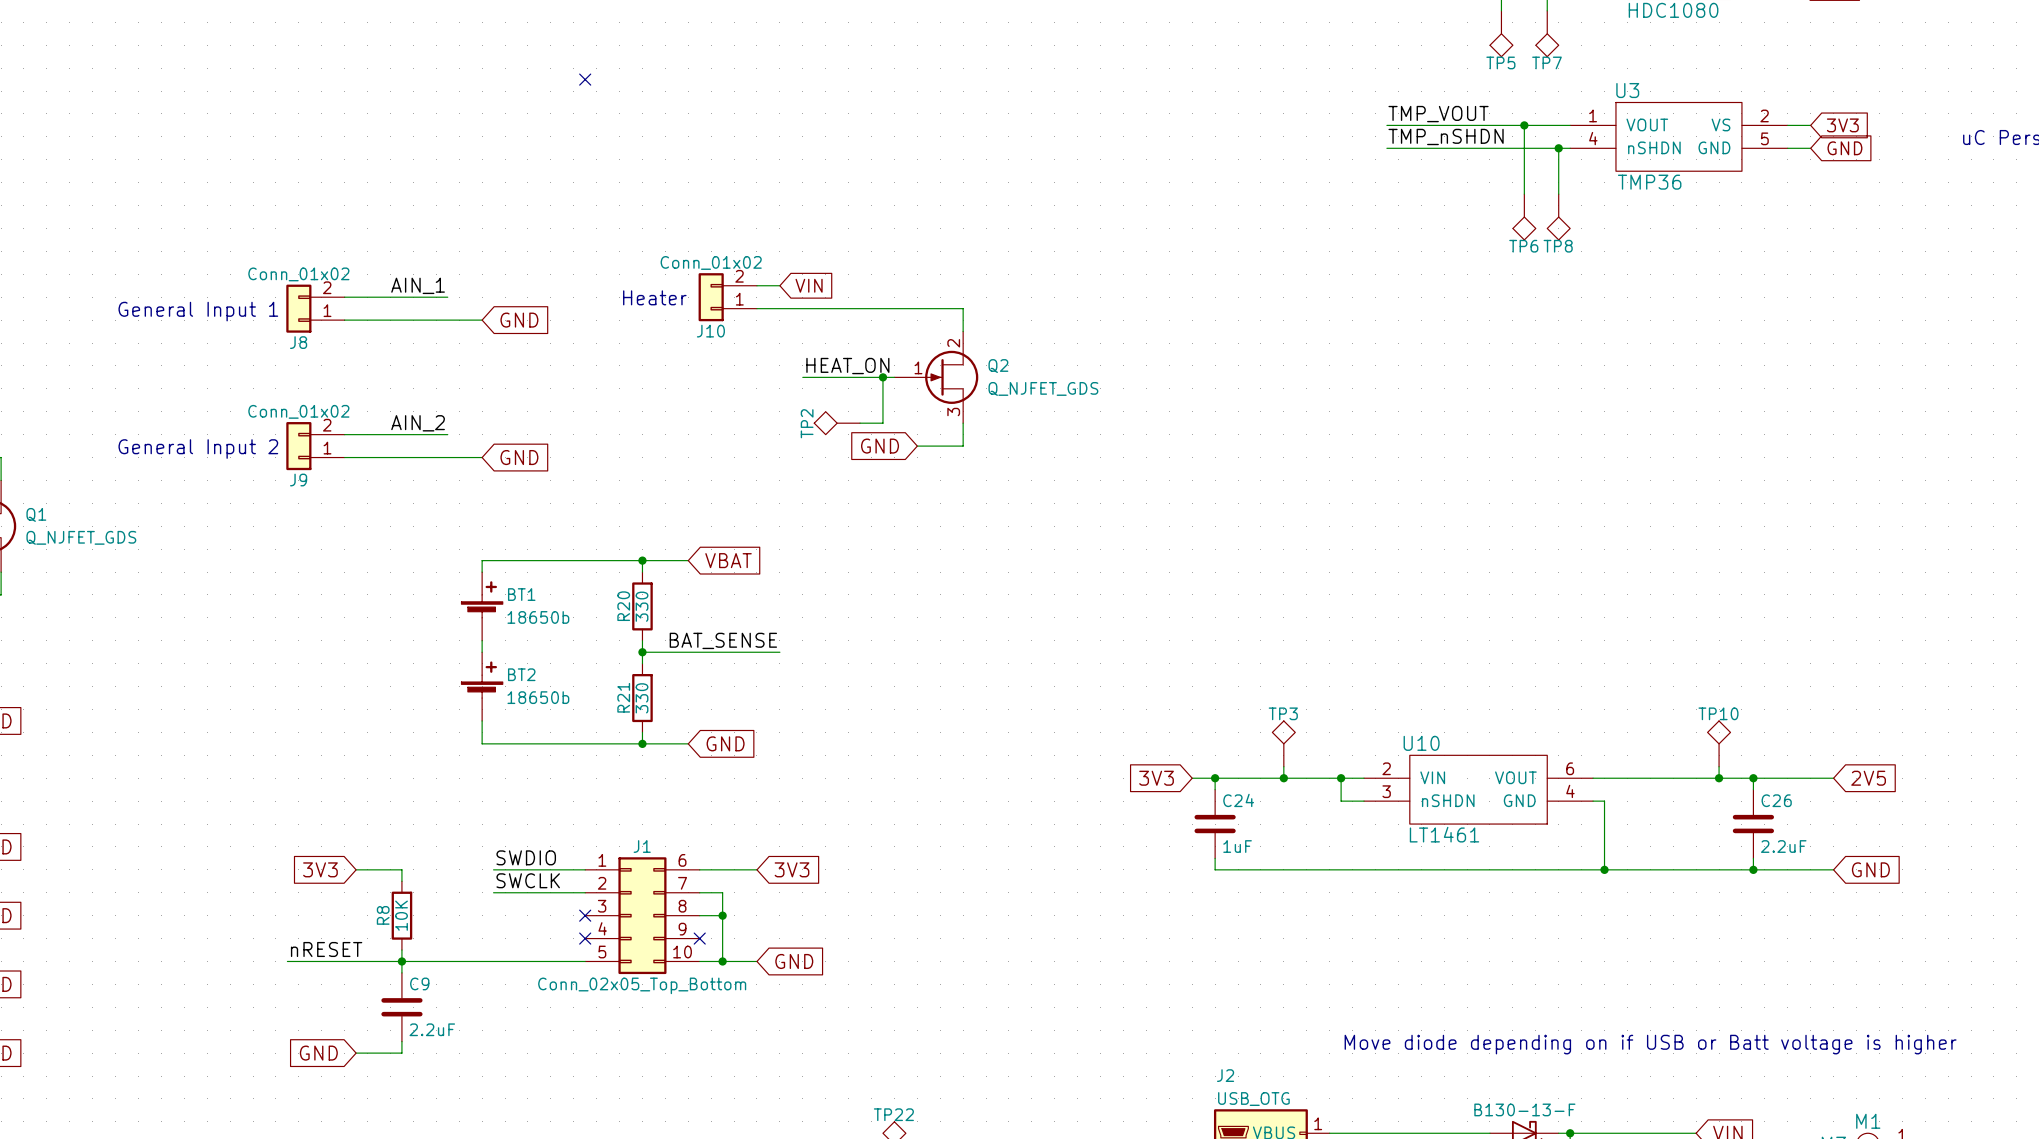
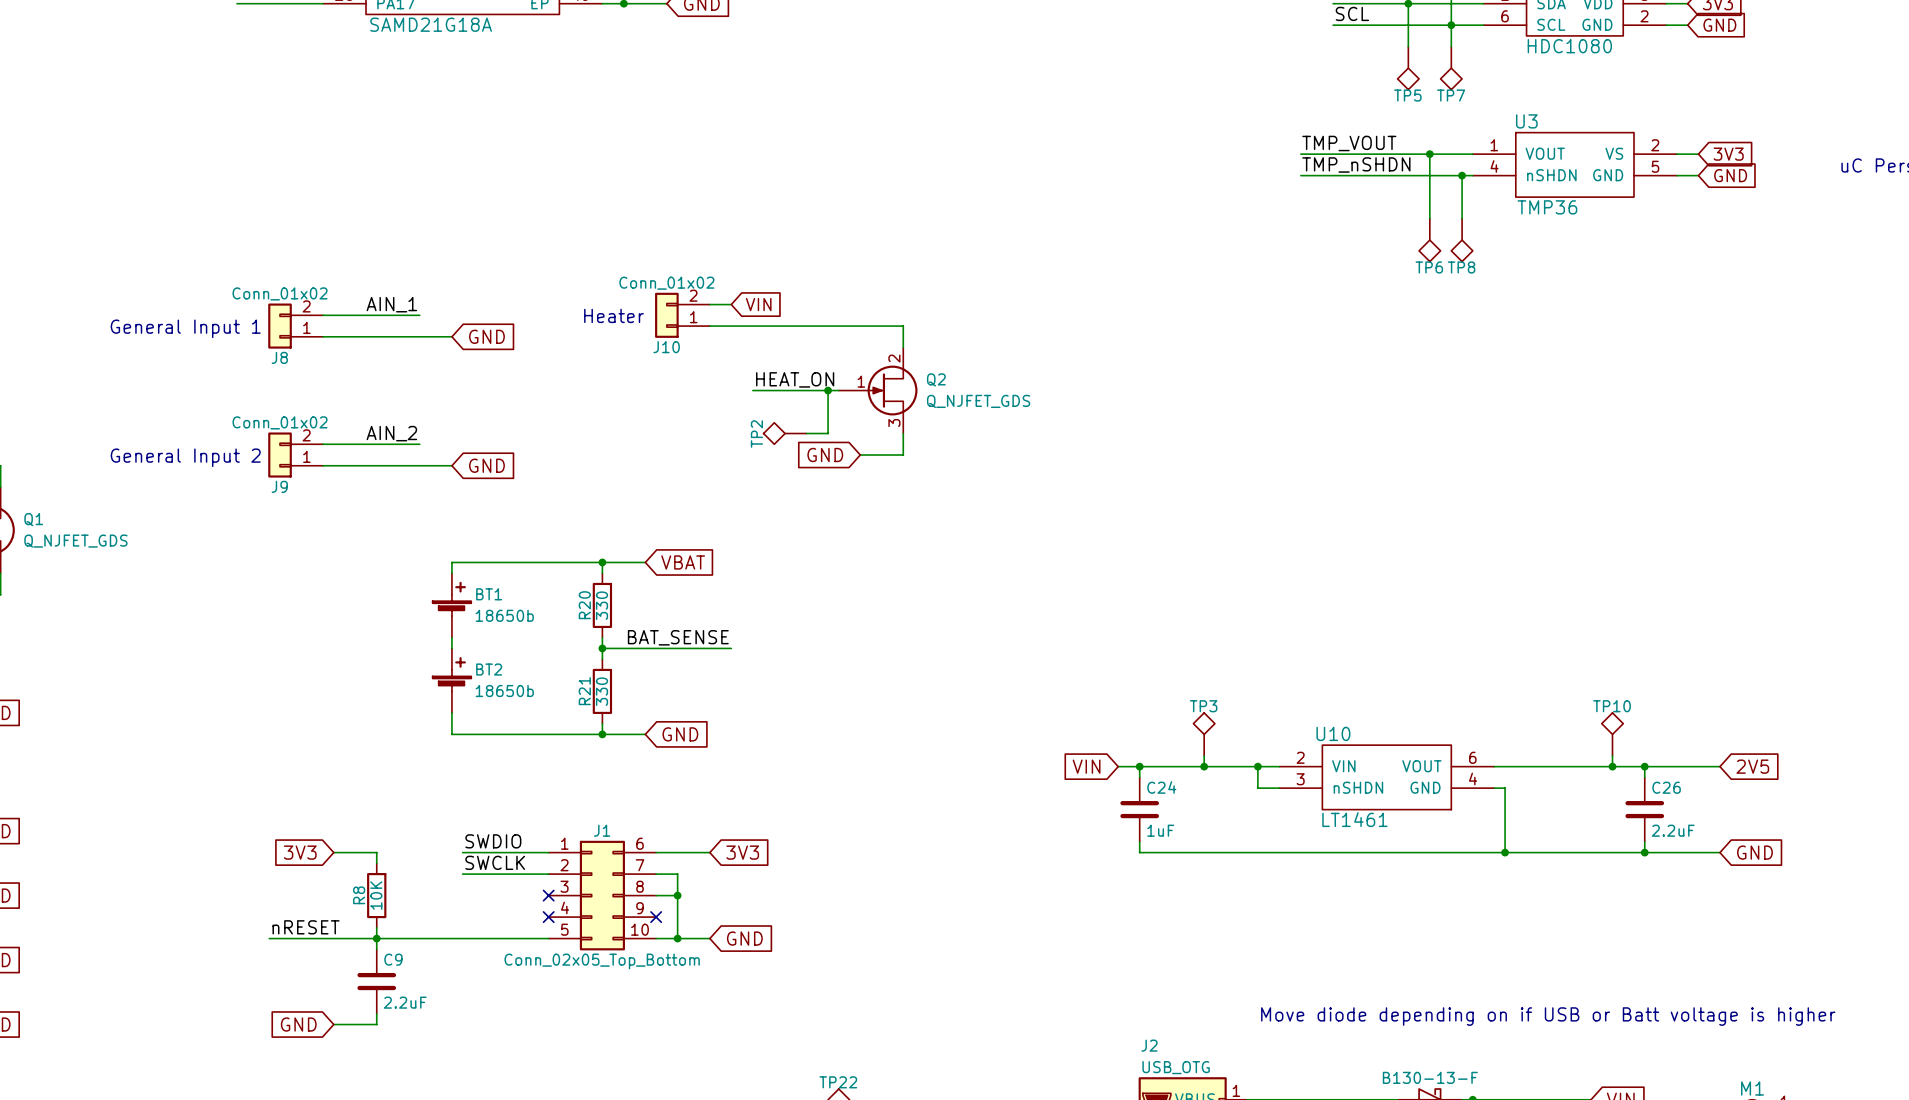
no-connect mark: (585, 79) -> none
global label: 3V3 (1156, 778) -> VIN (1086, 766)

